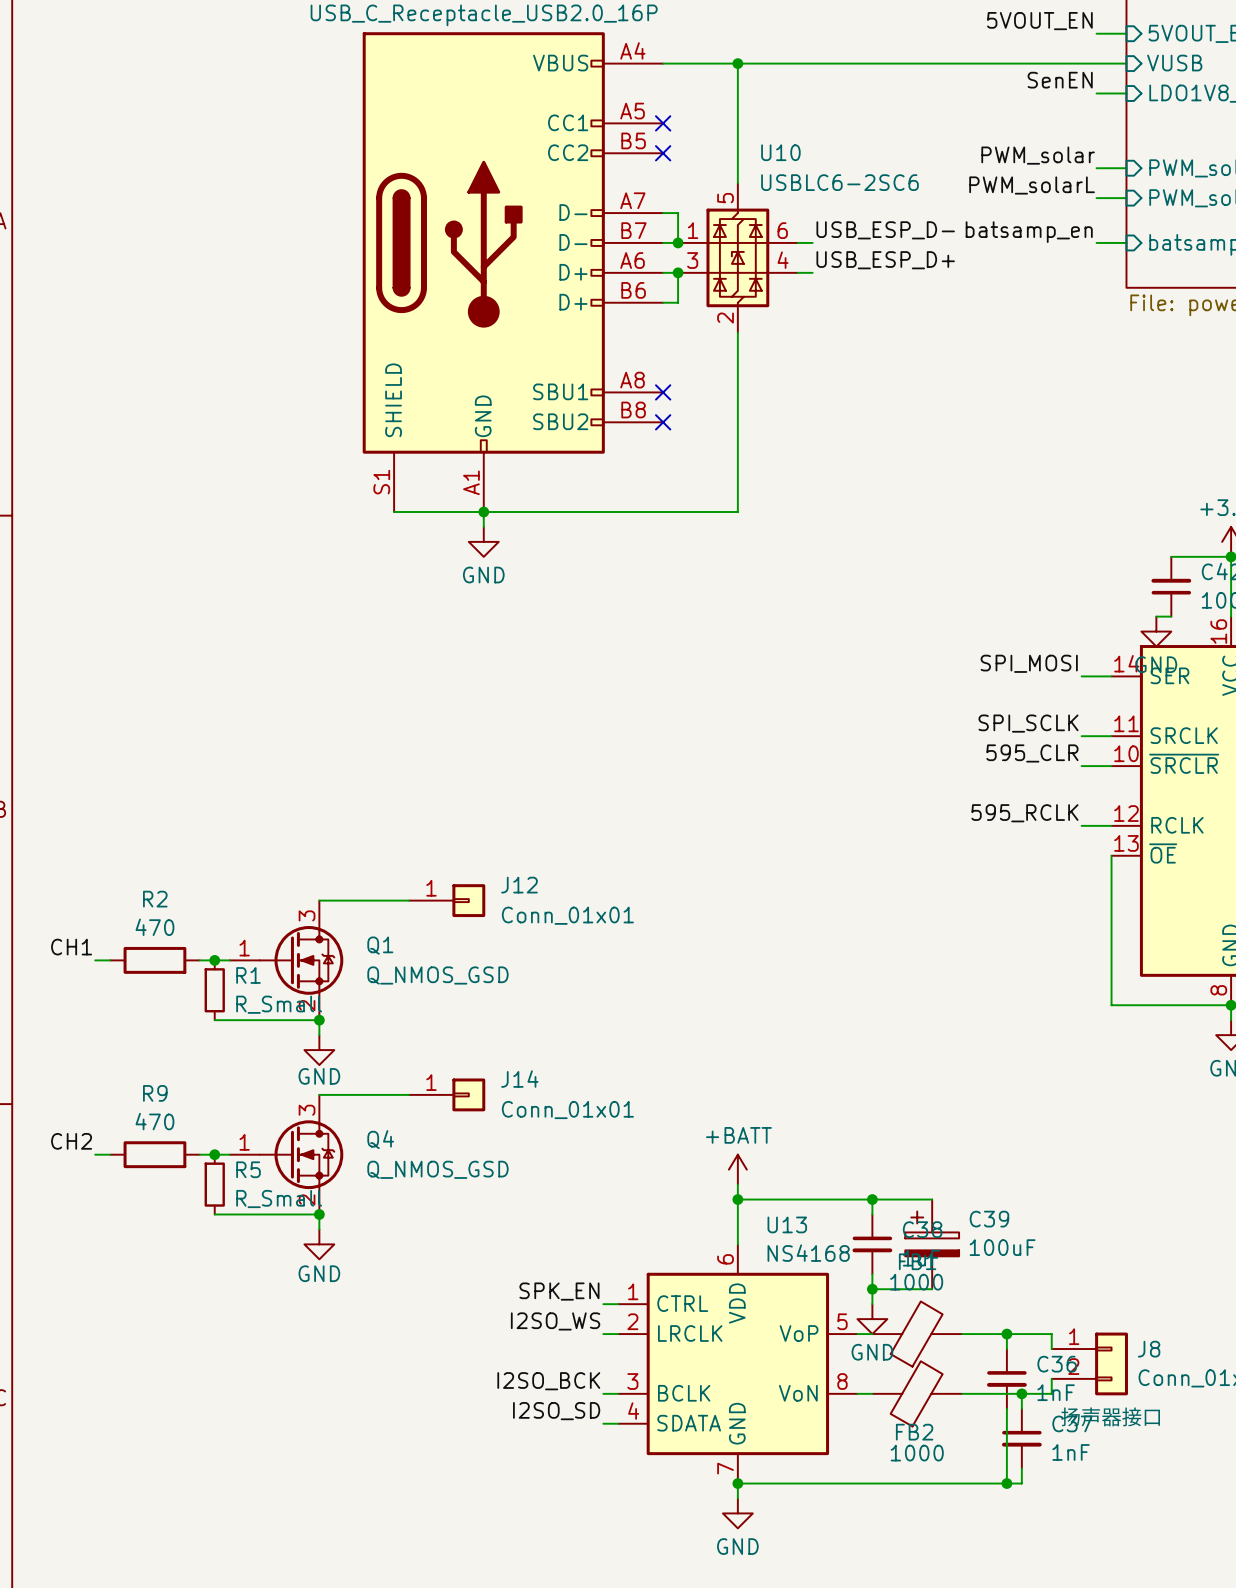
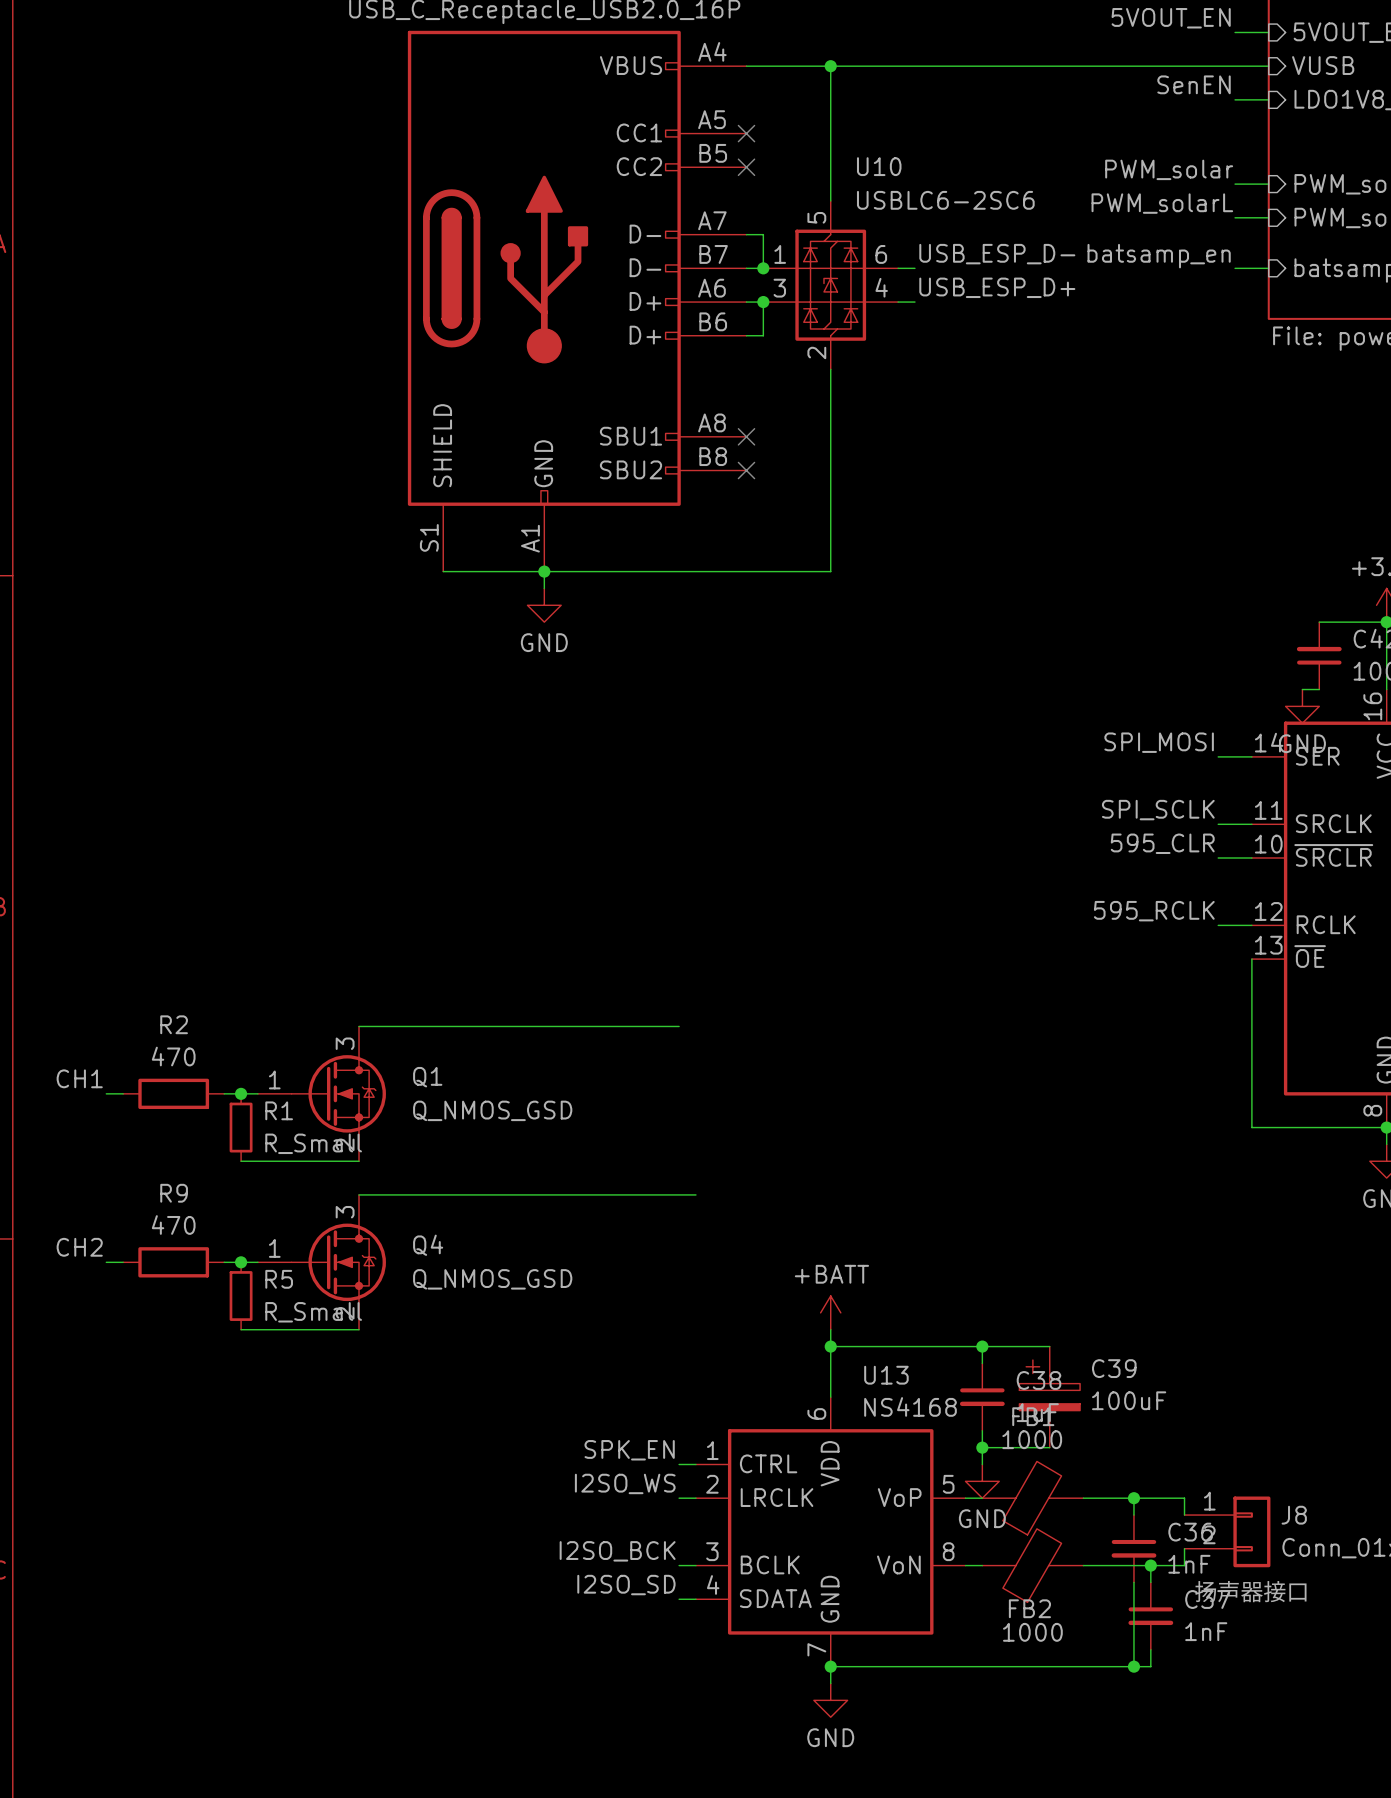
wire: (319, 900) (409, 900) -> none
J12: Conn_01x01 (447, 900) -> none
wire: none -> (359, 1026) (679, 1026)
label position: CH1 (71, 947) -> CH1 (79, 1078)
wire: (95, 960) (110, 960) -> (106, 1093) (123, 1093)
R2 position: (154, 960) -> (173, 1093)
wire: (199, 960) (229, 960) -> (224, 1093) (257, 1093)
junction position: (214, 960) -> (241, 1093)
Q1 position: (286, 960) -> (321, 1093)
R1 position: (214, 990) -> (241, 1127)
wire: (214, 1020) (319, 1020) (319, 1035) -> (241, 1161) (359, 1161)
junction: (319, 1020) -> none
power symbol: GND (319, 1050) -> none
wire: none -> (359, 1194) (695, 1194)
wire: (319, 1094) (409, 1094) -> none
J14: Conn_01x01 (447, 1094) -> none
label position: CH2 (71, 1141) -> CH2 (79, 1247)
wire: (95, 1154) (110, 1154) -> (106, 1262) (123, 1262)
R9 position: (154, 1154) -> (173, 1262)
wire: (199, 1154) (229, 1154) -> (224, 1262) (257, 1262)
junction position: (214, 1154) -> (241, 1262)
Q4 position: (286, 1154) -> (321, 1262)
wire: none -> (241, 1329) (359, 1329)
R5 position: (214, 1184) -> (241, 1296)
wire: (214, 1214) (319, 1214) (319, 1229) -> none
junction: (319, 1214) -> none
power symbol: GND (319, 1244) -> none

